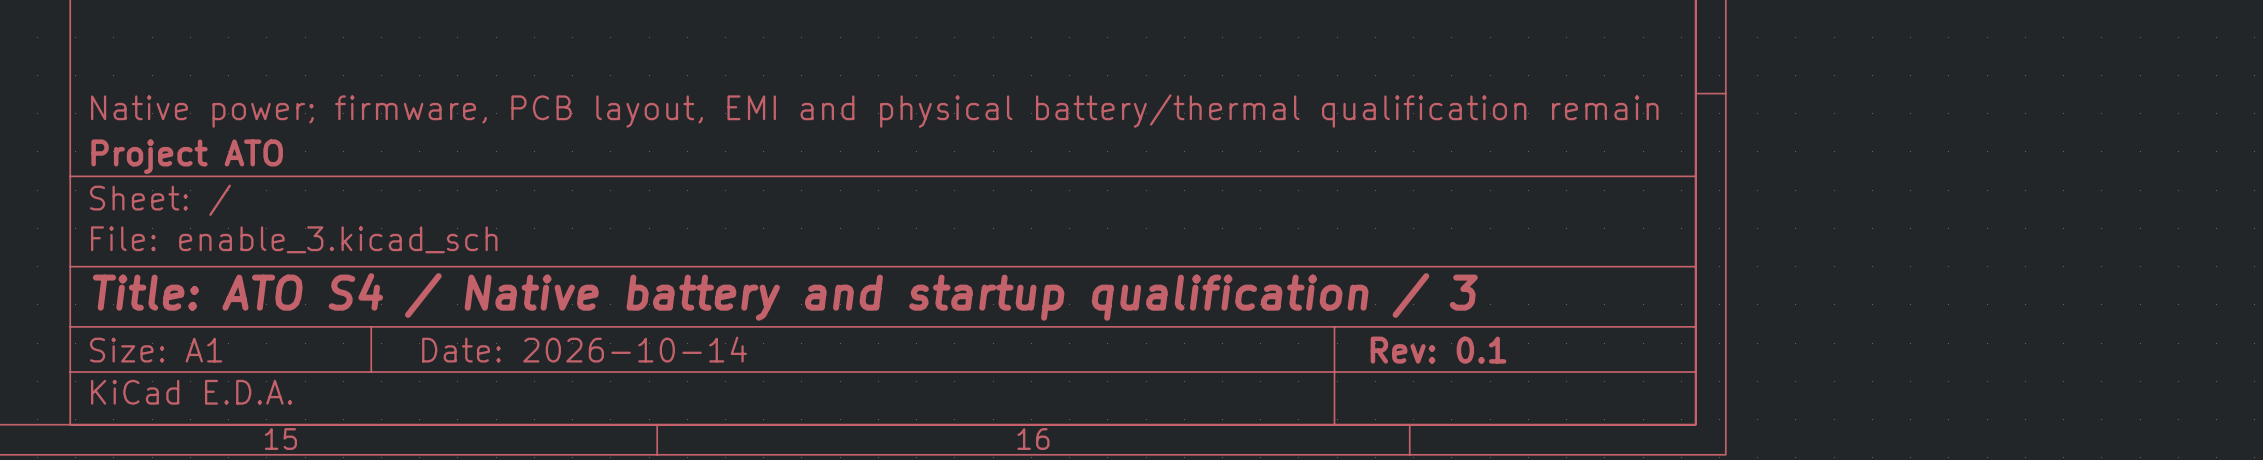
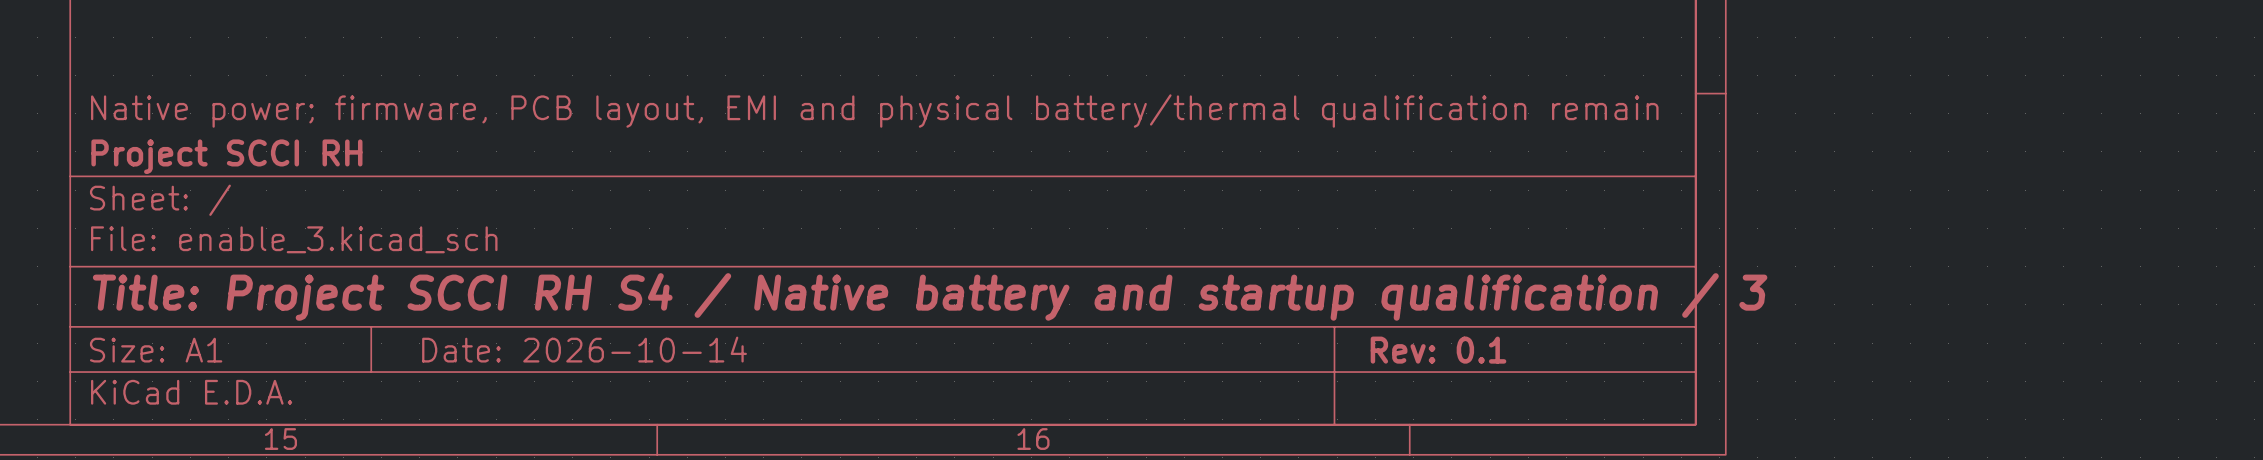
title block: Project ATO (187, 156) -> Project SCCI RH (226, 156)
title block: Title: ATO S4 / Native battery and startup qualification / 3 (785, 296) -> Title: Project SCCI RH S4 / Native battery and startup qualification / 3 (930, 296)

